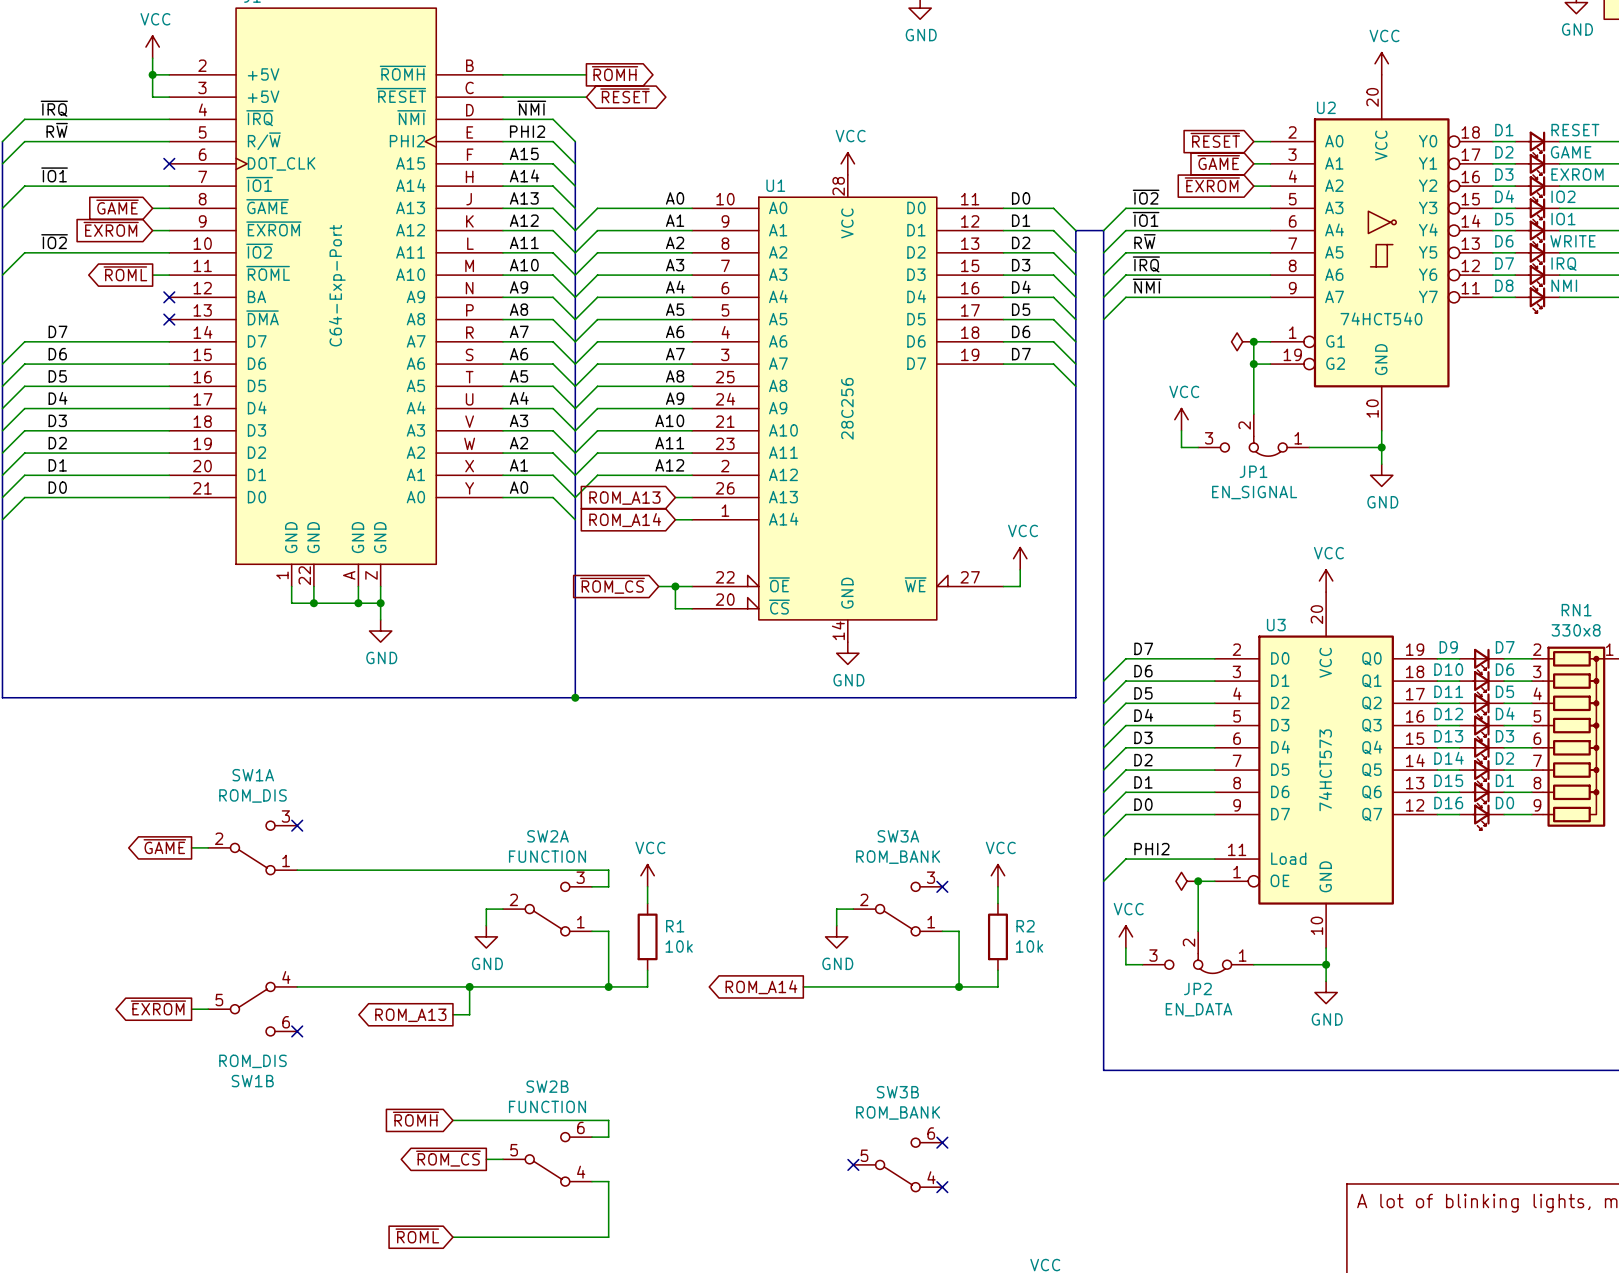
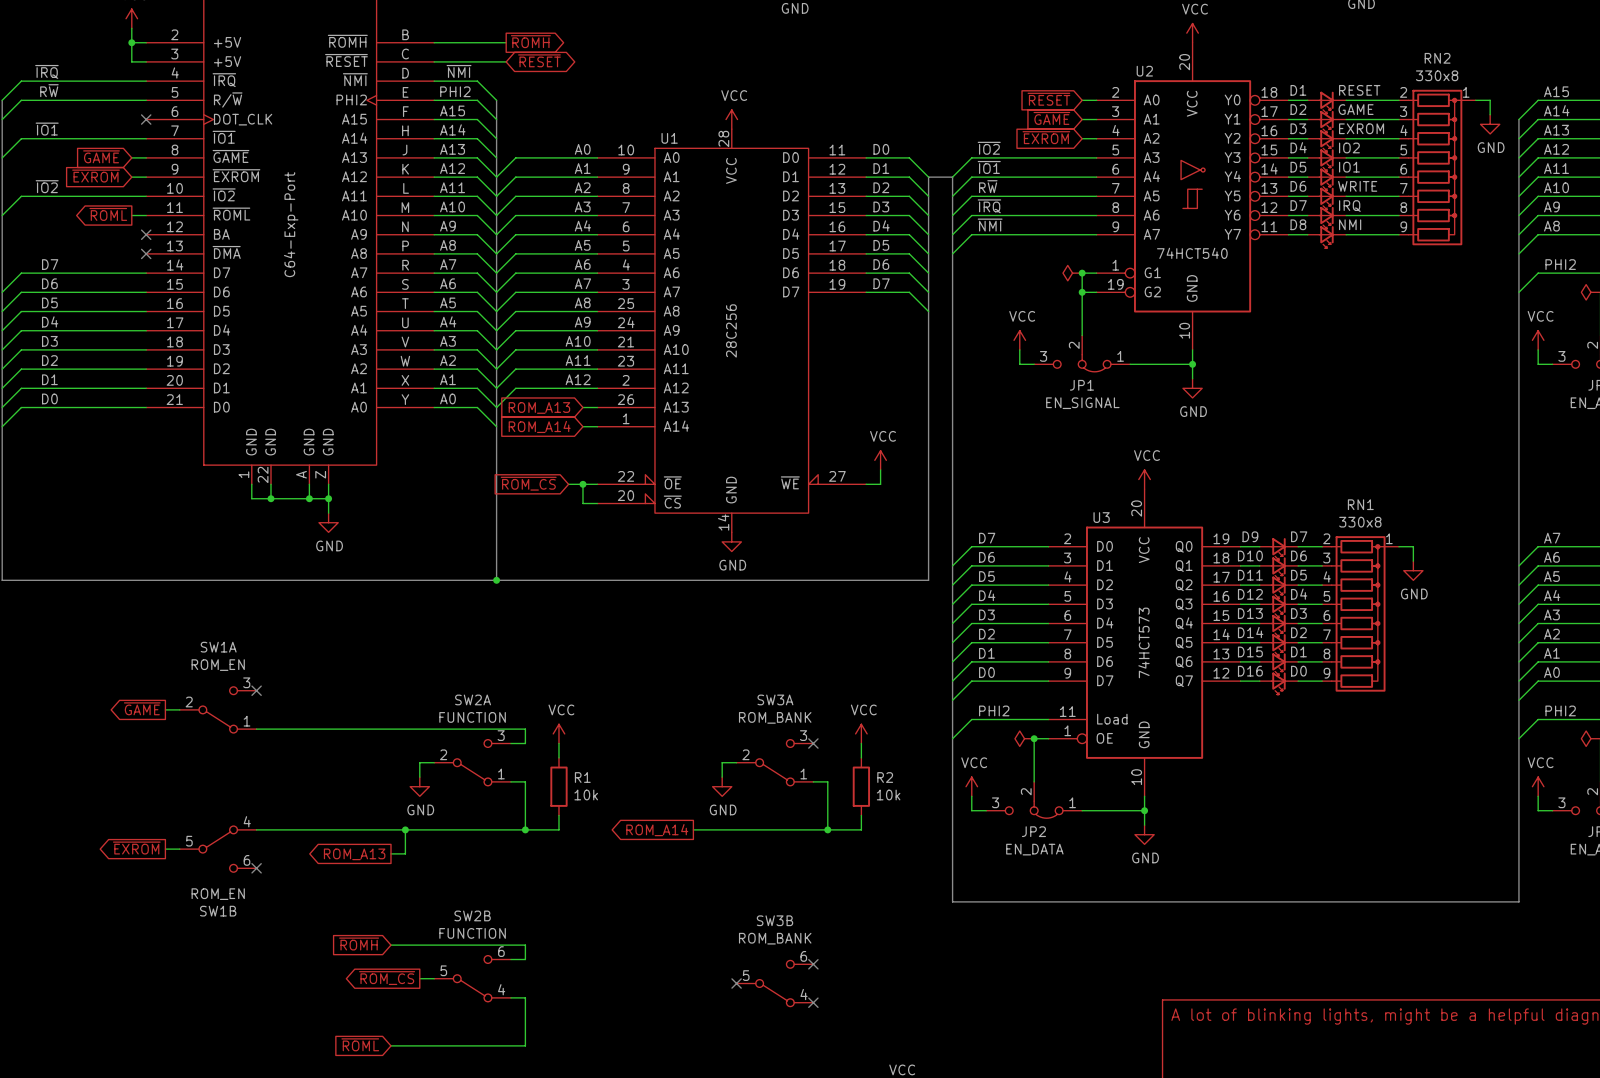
SW1A value: ROM_DIS (253, 795) -> ROM_EN (218, 665)
SW1B value: ROM_DIS (253, 1061) -> ROM_EN (218, 894)

